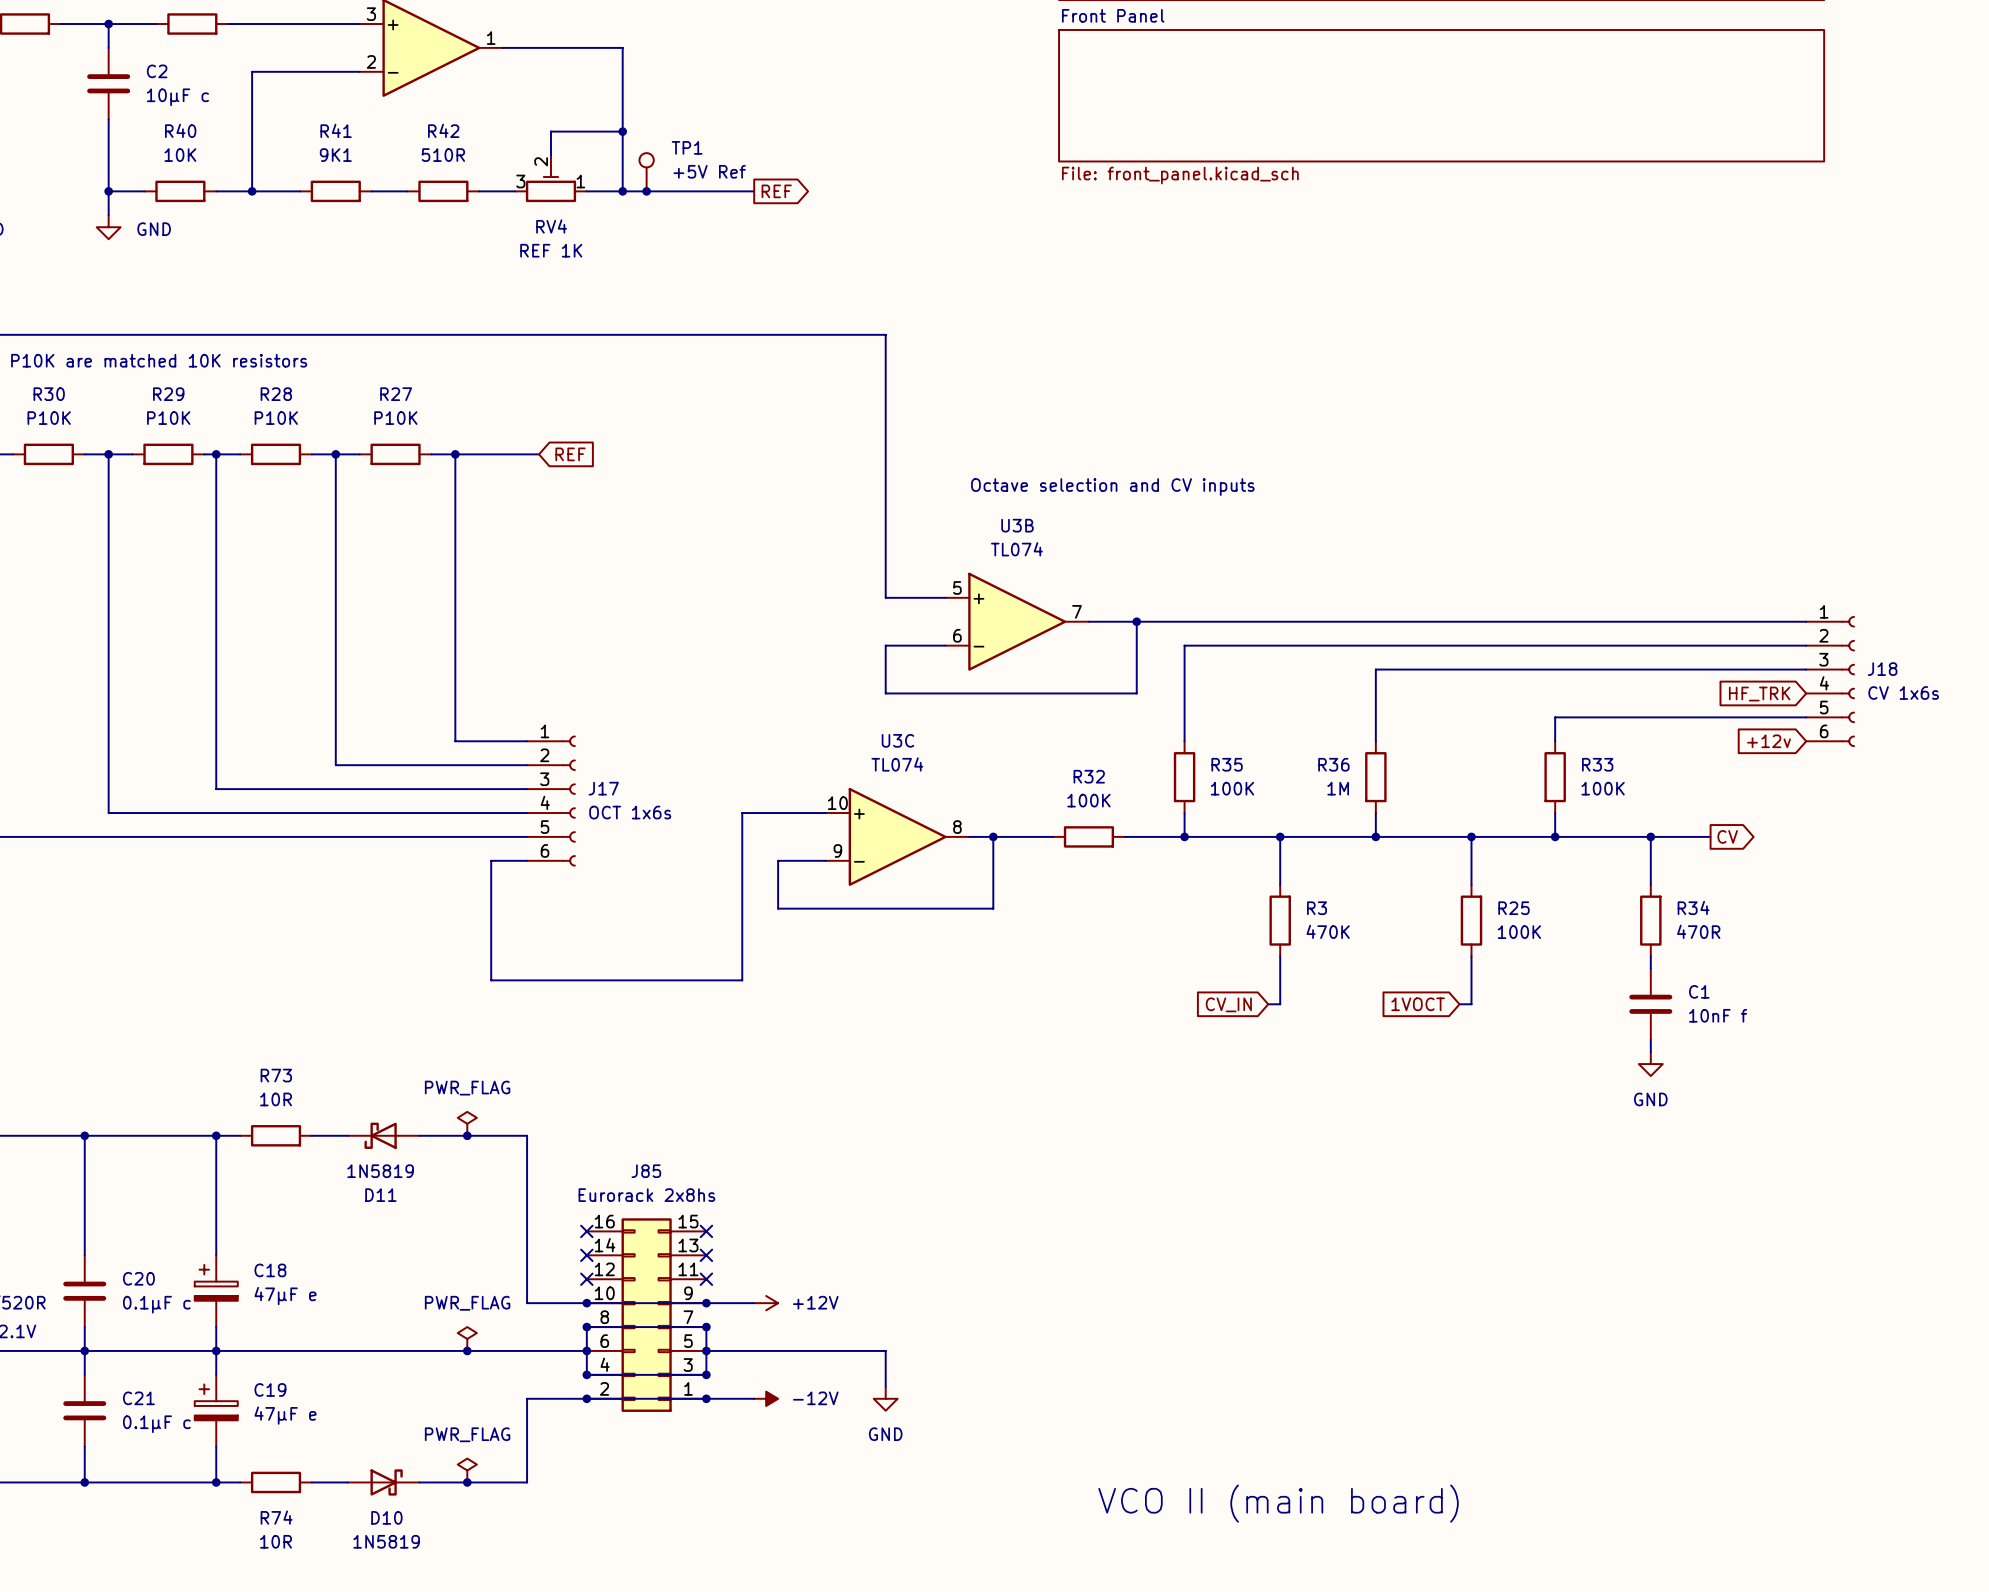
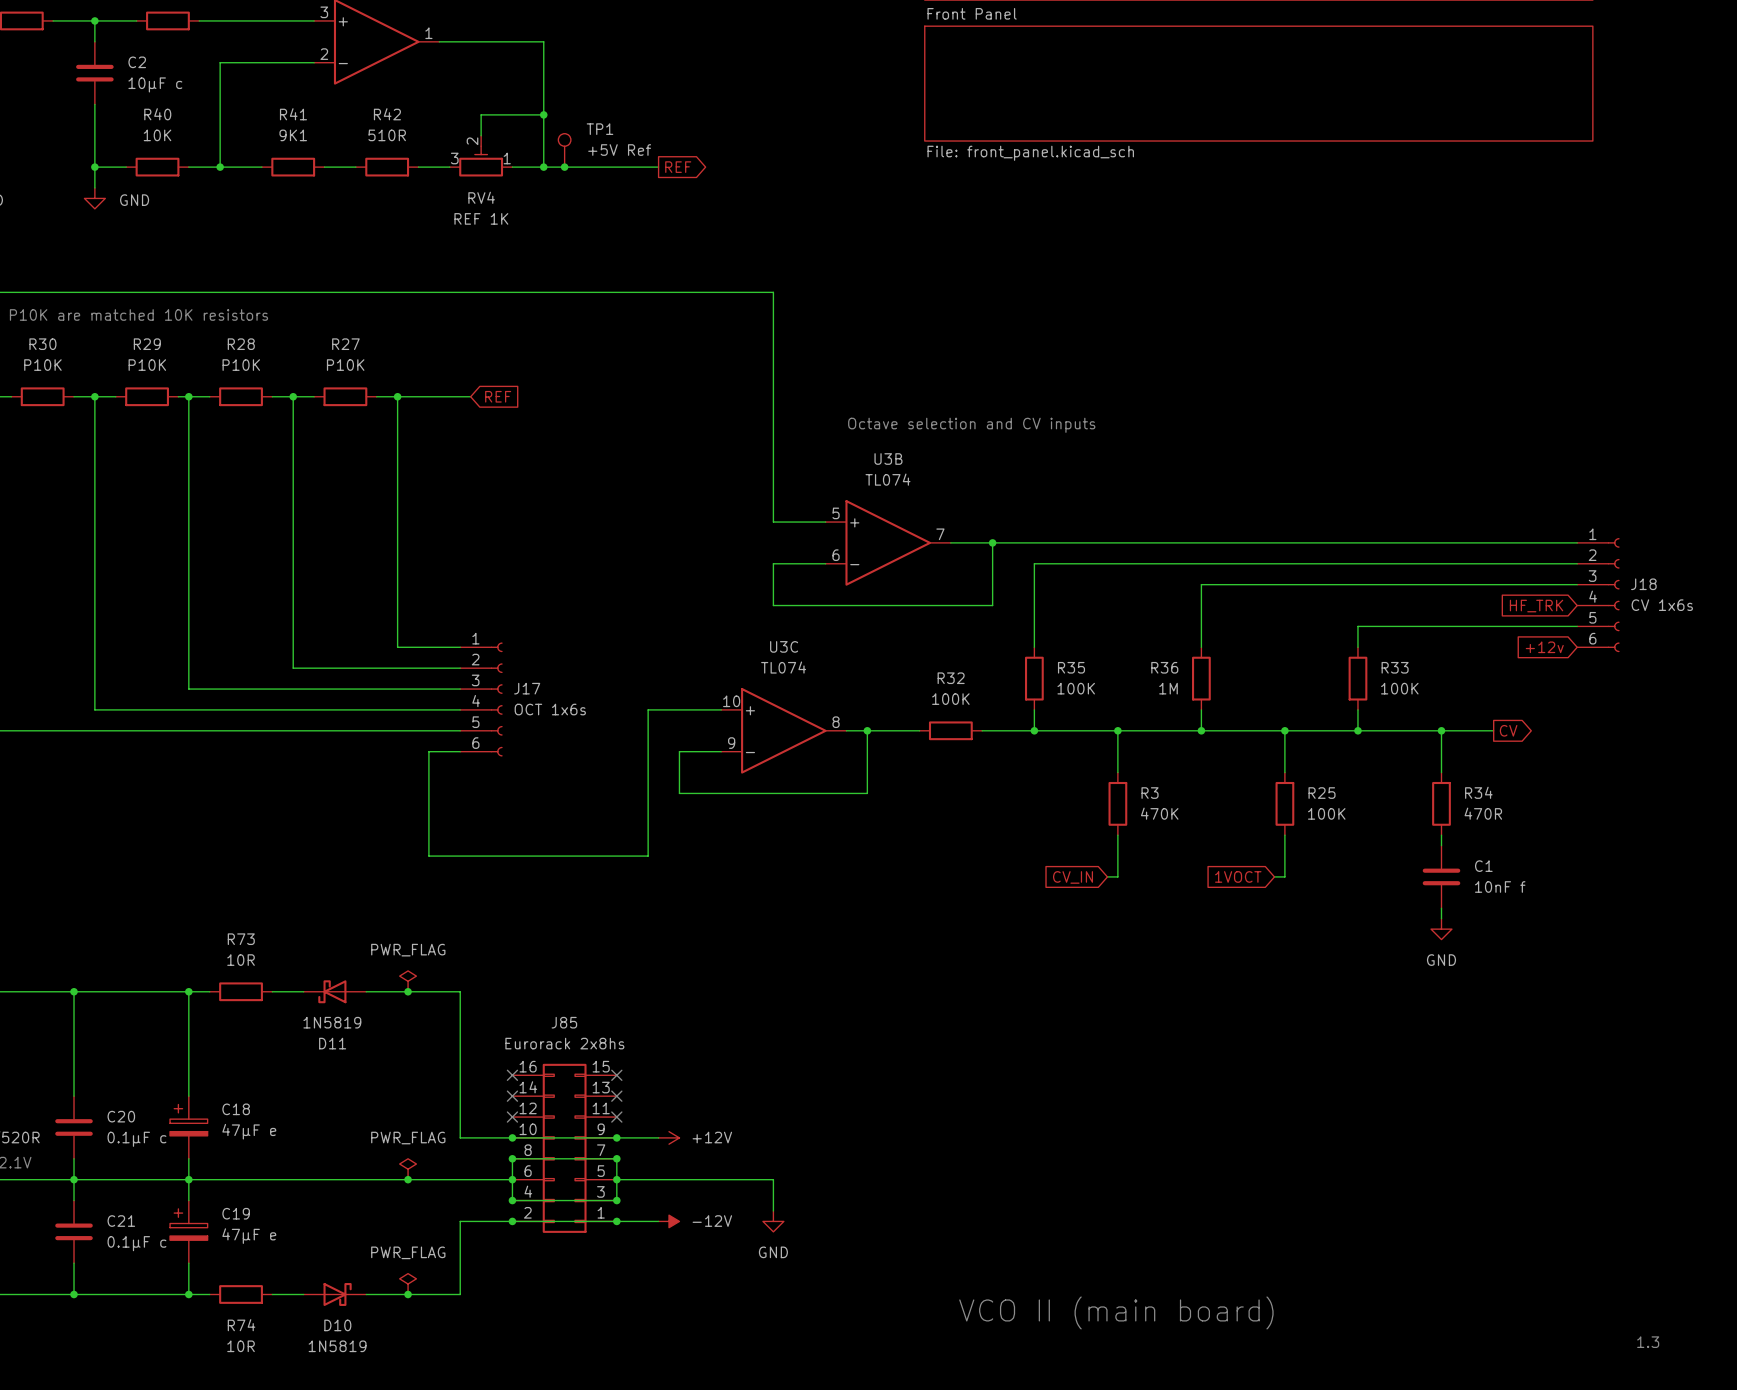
text: none -> 1.3 (1648, 1342)

